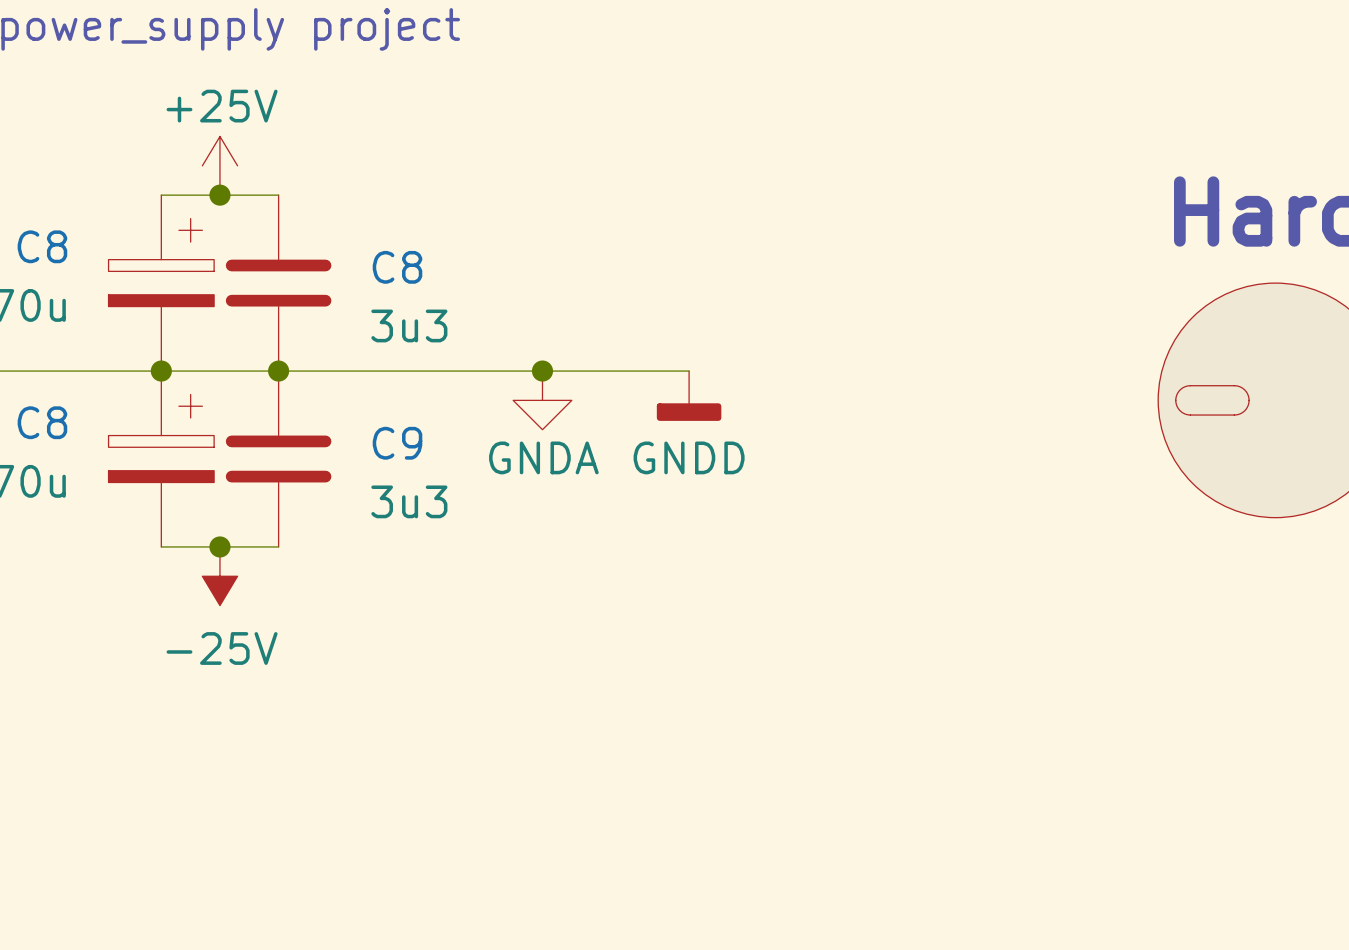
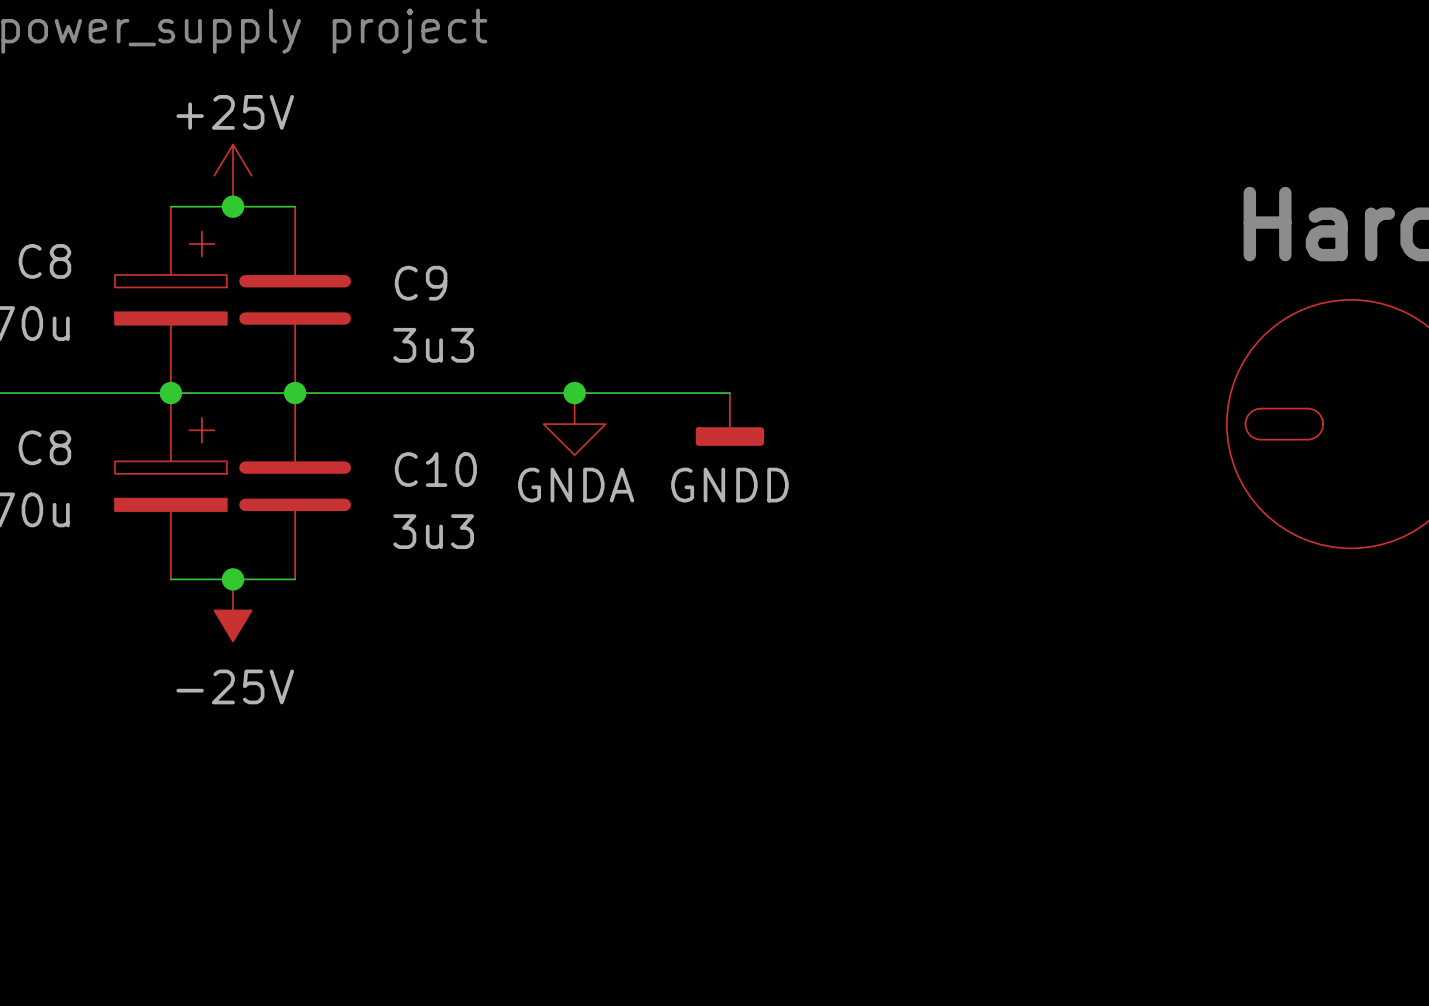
C8 name: C8 (397, 267) -> C9 (421, 283)
C9 name: C9 (397, 443) -> C10 (435, 469)

